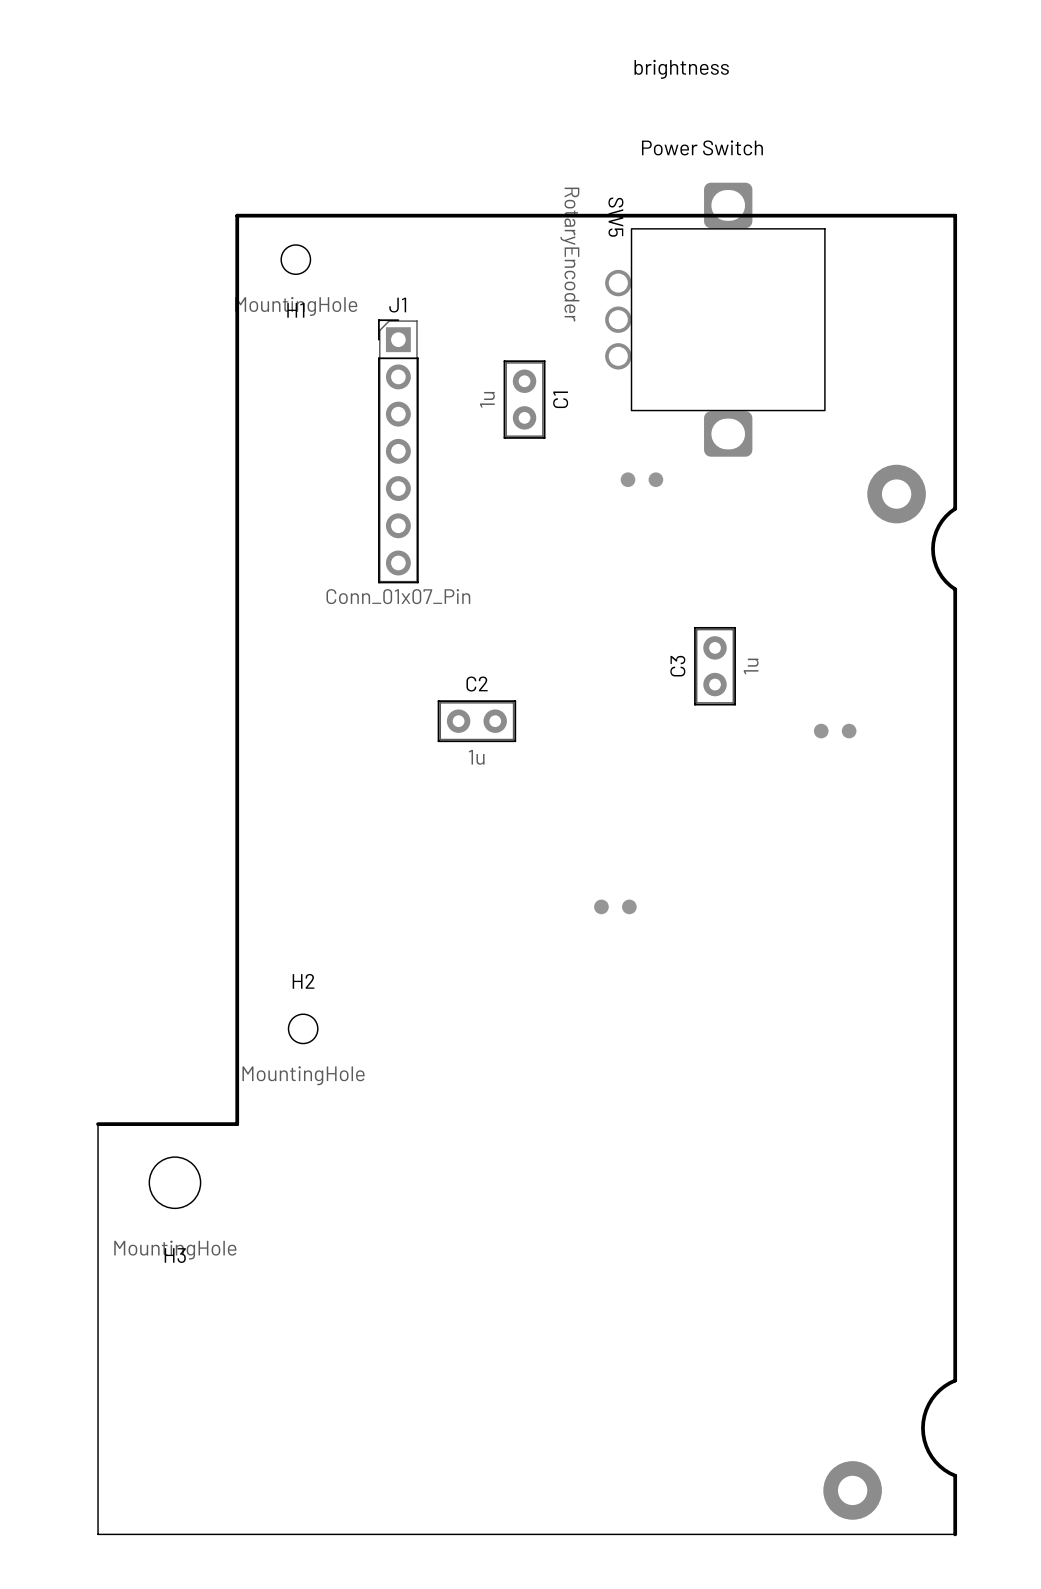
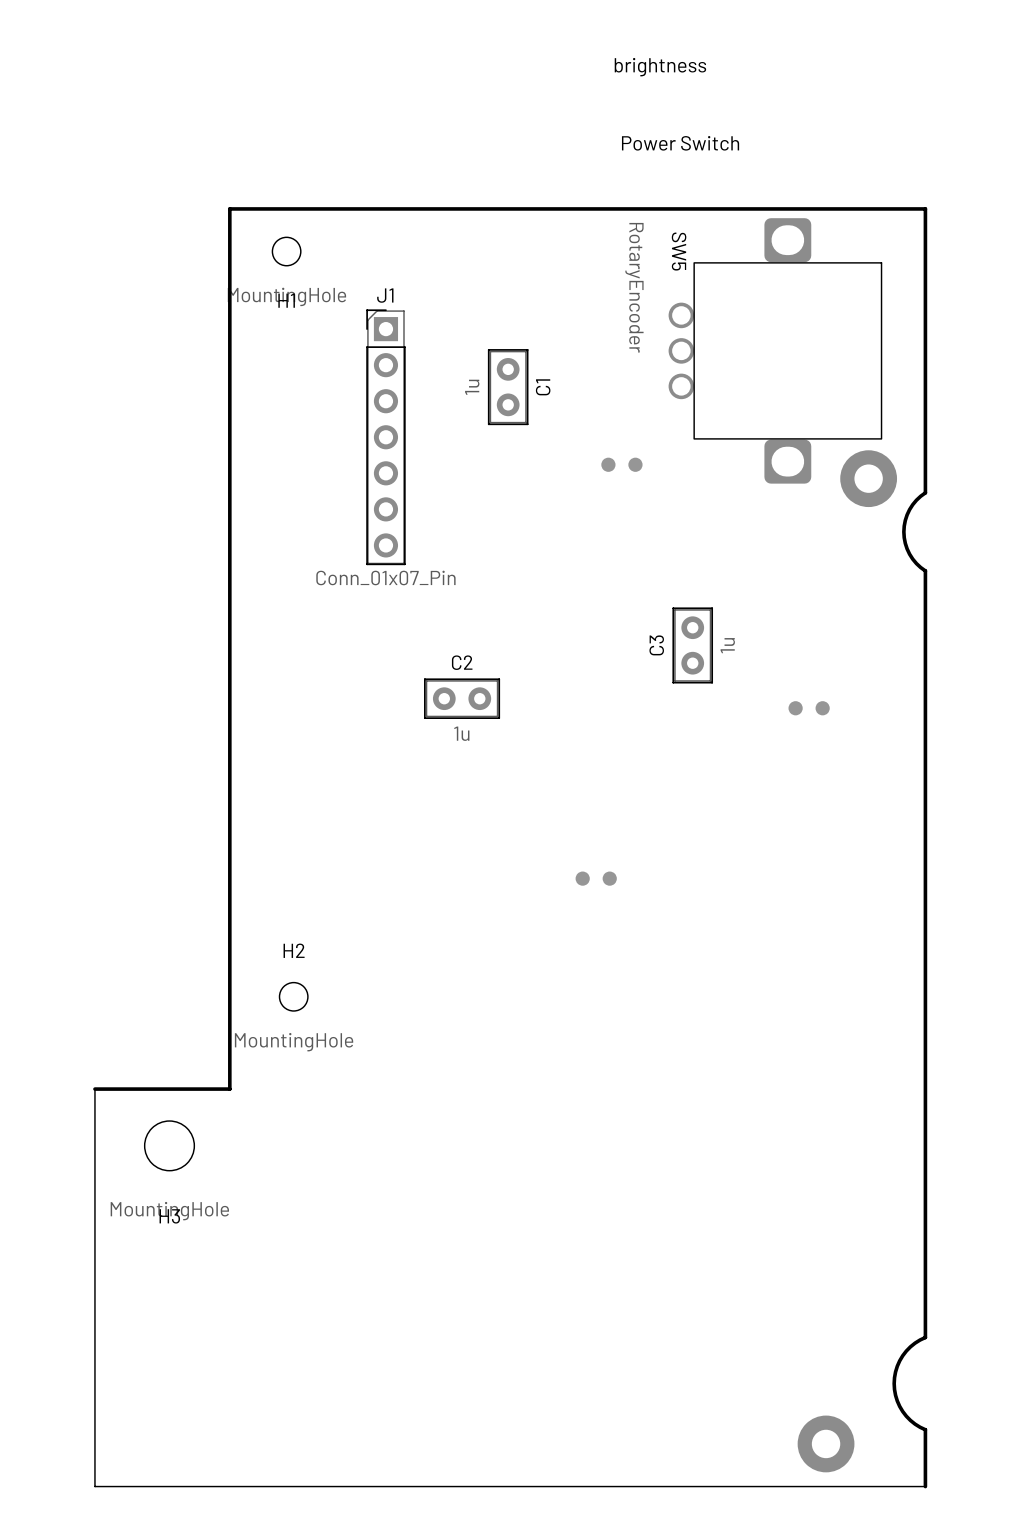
SW5 position: (715, 319) -> (775, 350)

